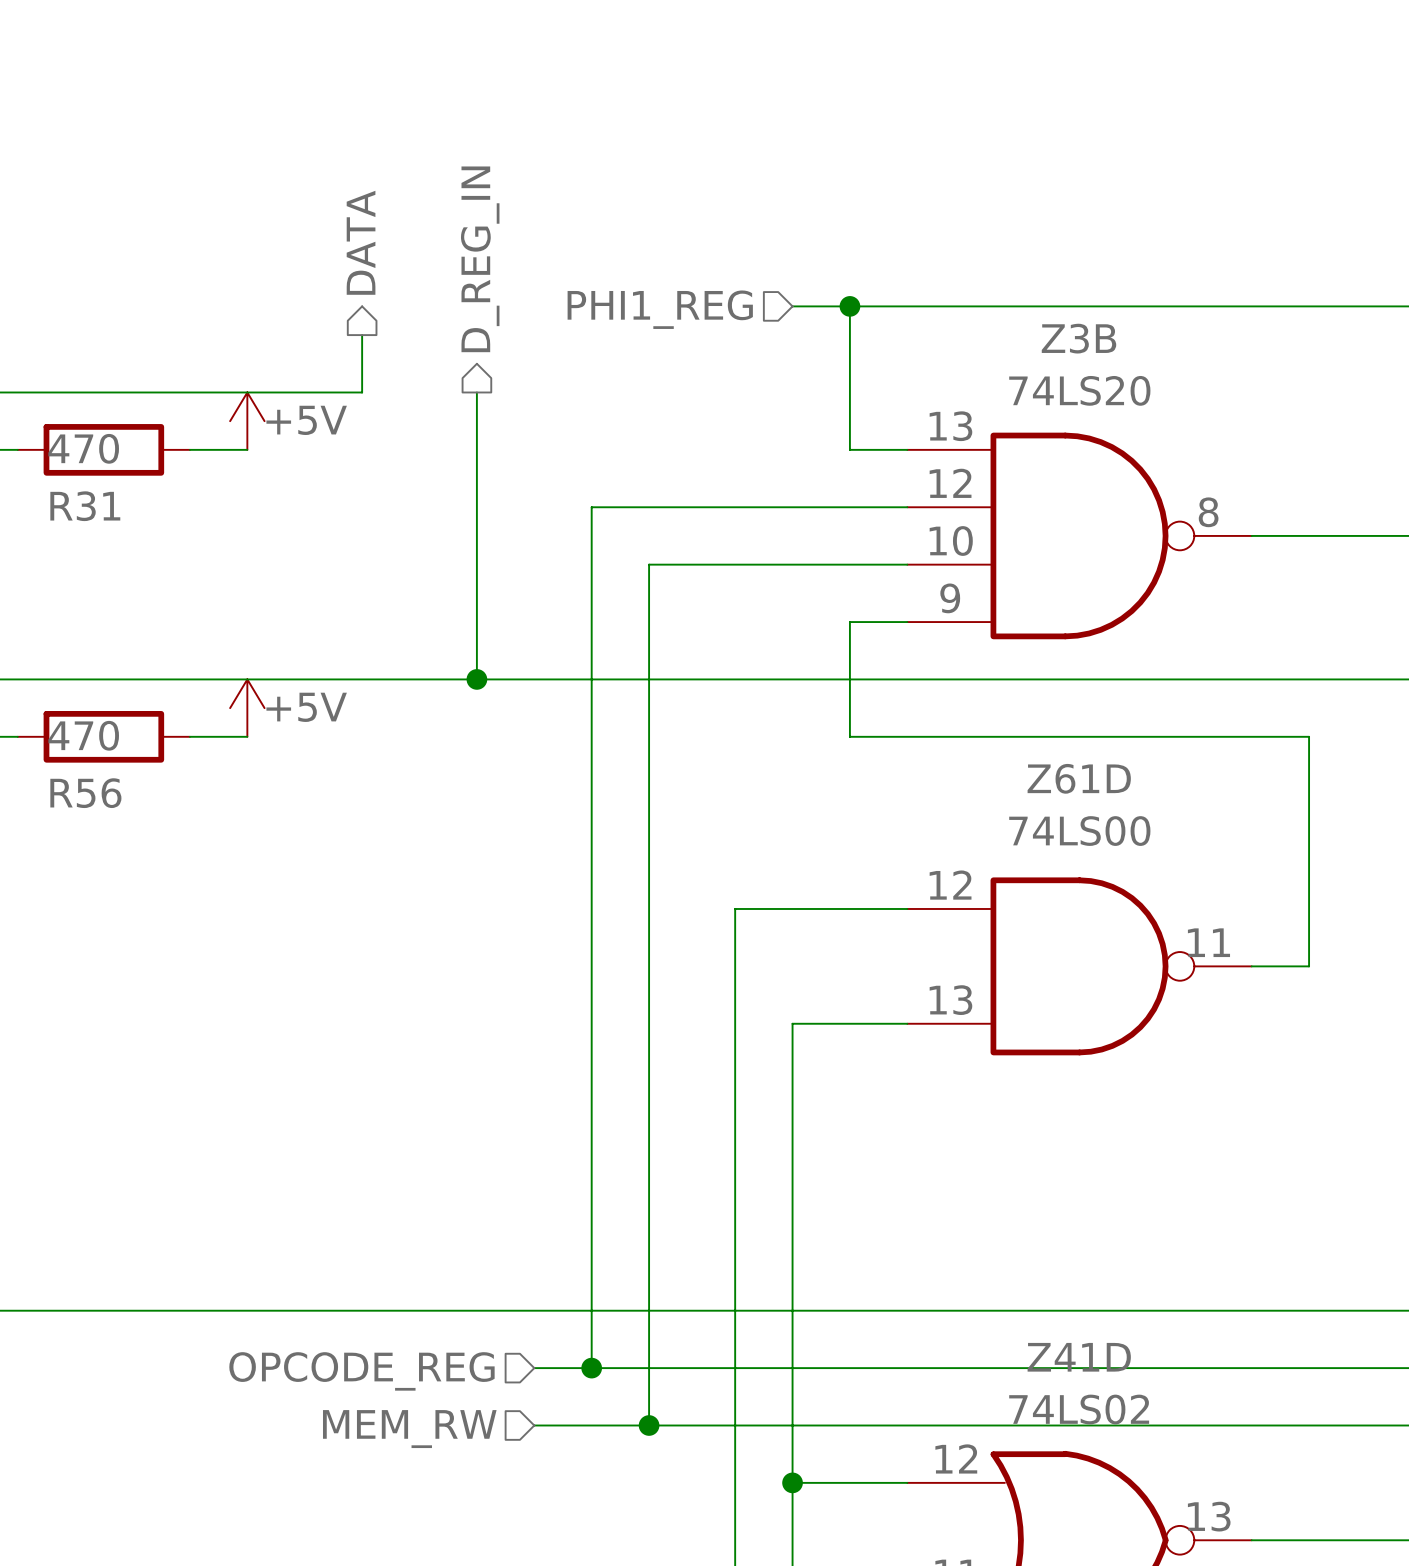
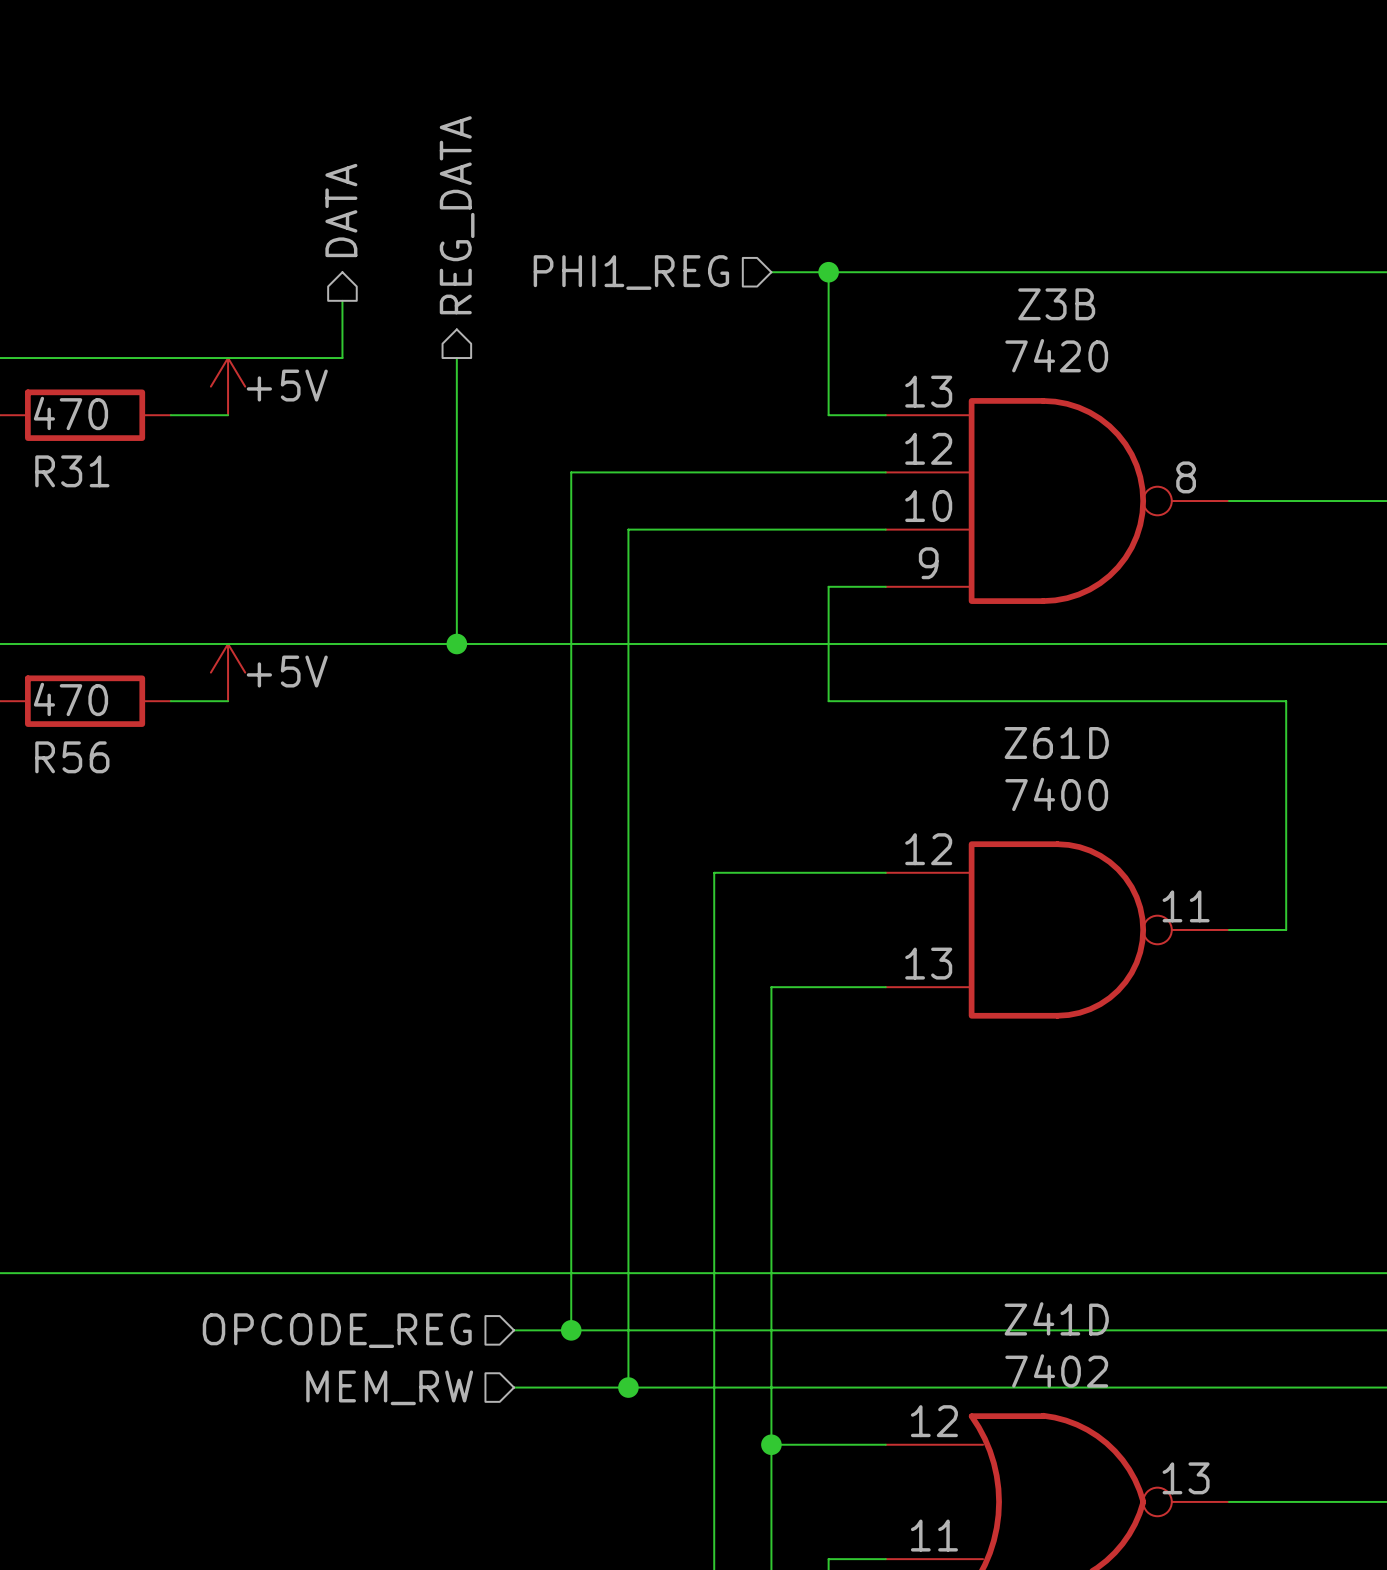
hierarchical label: D_REG_IN (480, 259) -> REG_DATA (457, 215)
Z3B value: 74LS20 (1079, 390) -> 7420 (1056, 355)
Z61D value: 74LS00 (1079, 831) -> 7400 (1056, 794)
Z41D value: 74LS02 (1079, 1409) -> 7402 (1056, 1370)

